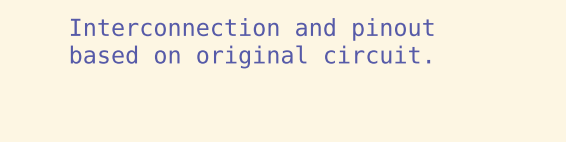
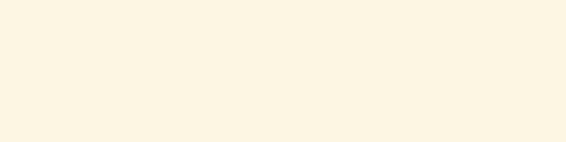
text: Interconnection and pinout (252, 29) -> none
text: based on original circuit. (250, 56) -> none

